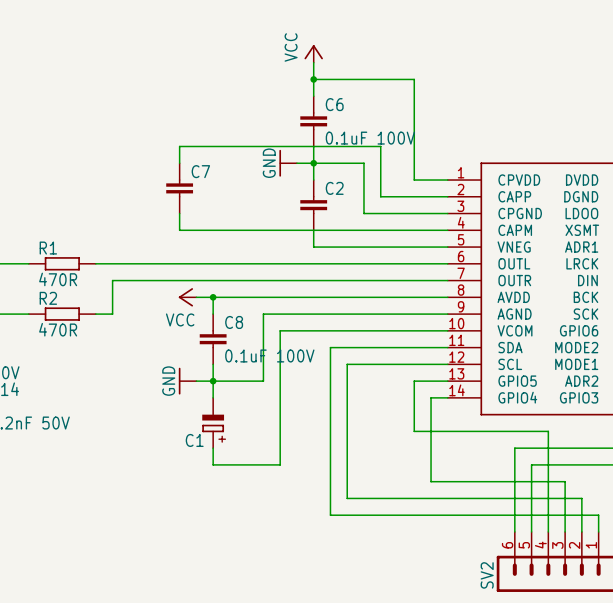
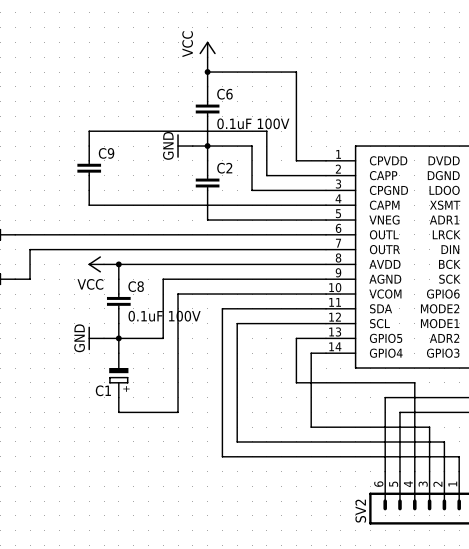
C7 name: C7 (200, 171) -> C9 (106, 153)

